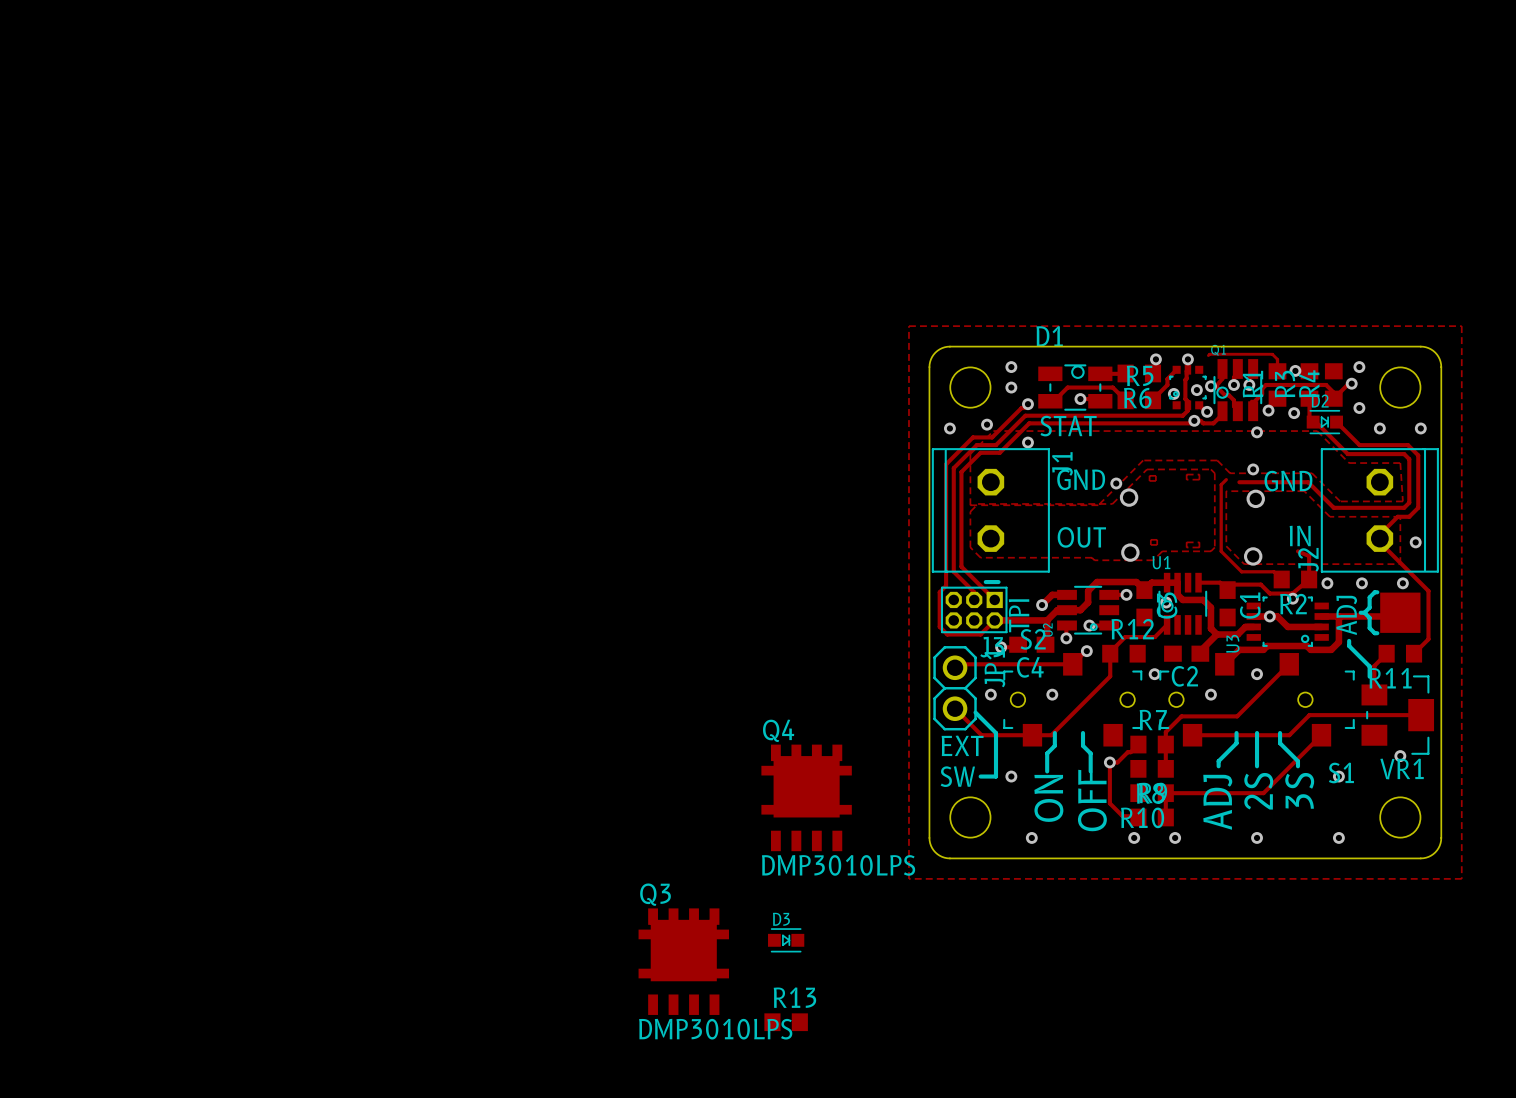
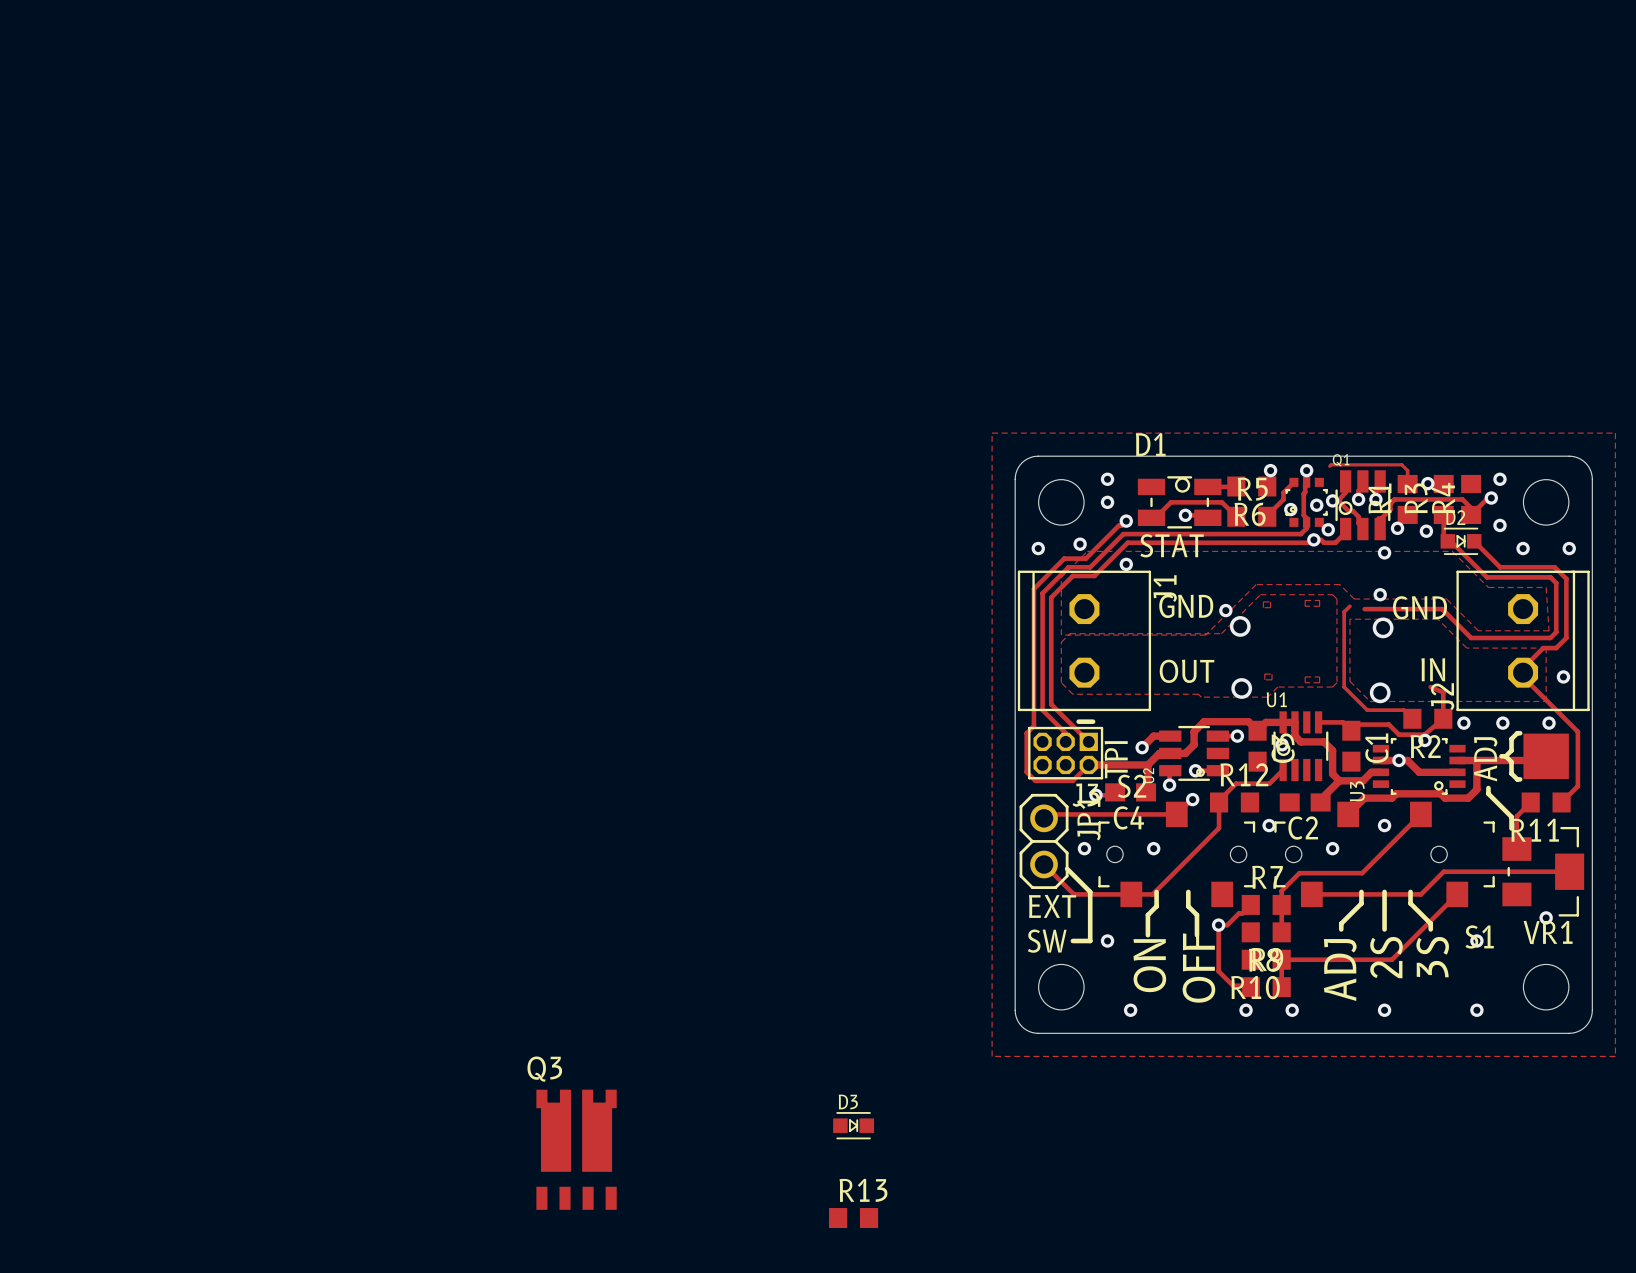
Q4: DMP3010LPS (806, 797) -> none
Q3 footprint: [638, 908, 729, 1015] -> [536, 1089, 617, 1210]
Q3 value: DMP3010LPS (715, 1029) -> none

